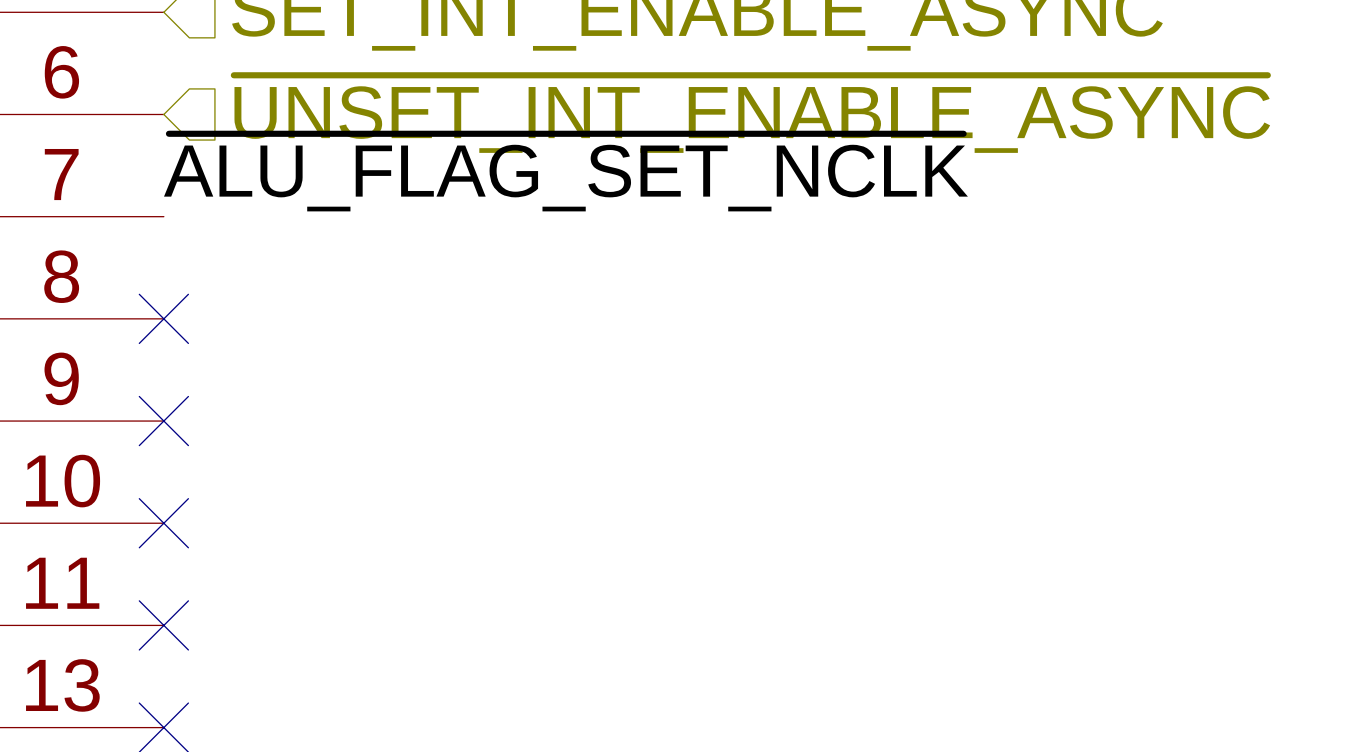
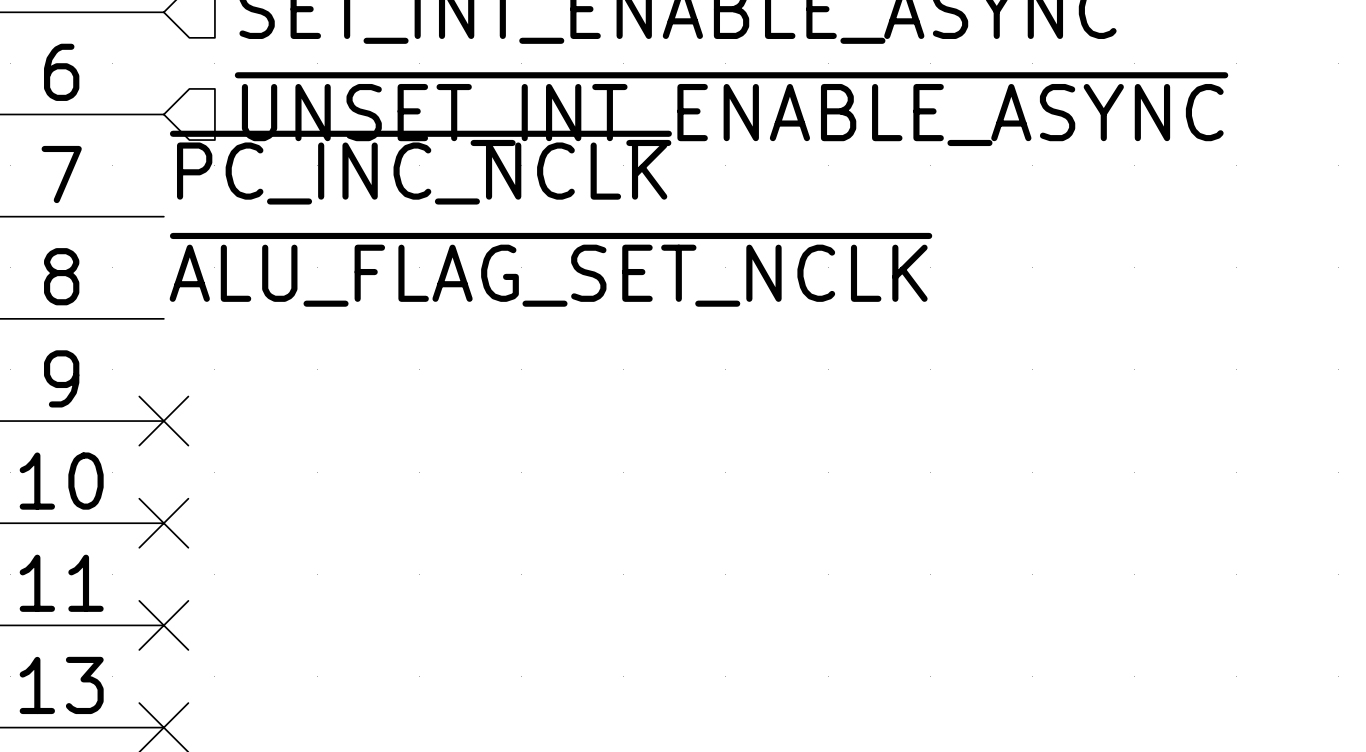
label: ~{ALU_FLAG_SET_NCLK} (565, 172) -> ~{PC_INC_NCLK} (420, 167)
label: none -> ~{ALU_FLAG_SET_NCLK} (550, 269)
no-connect mark: (163, 318) -> none

